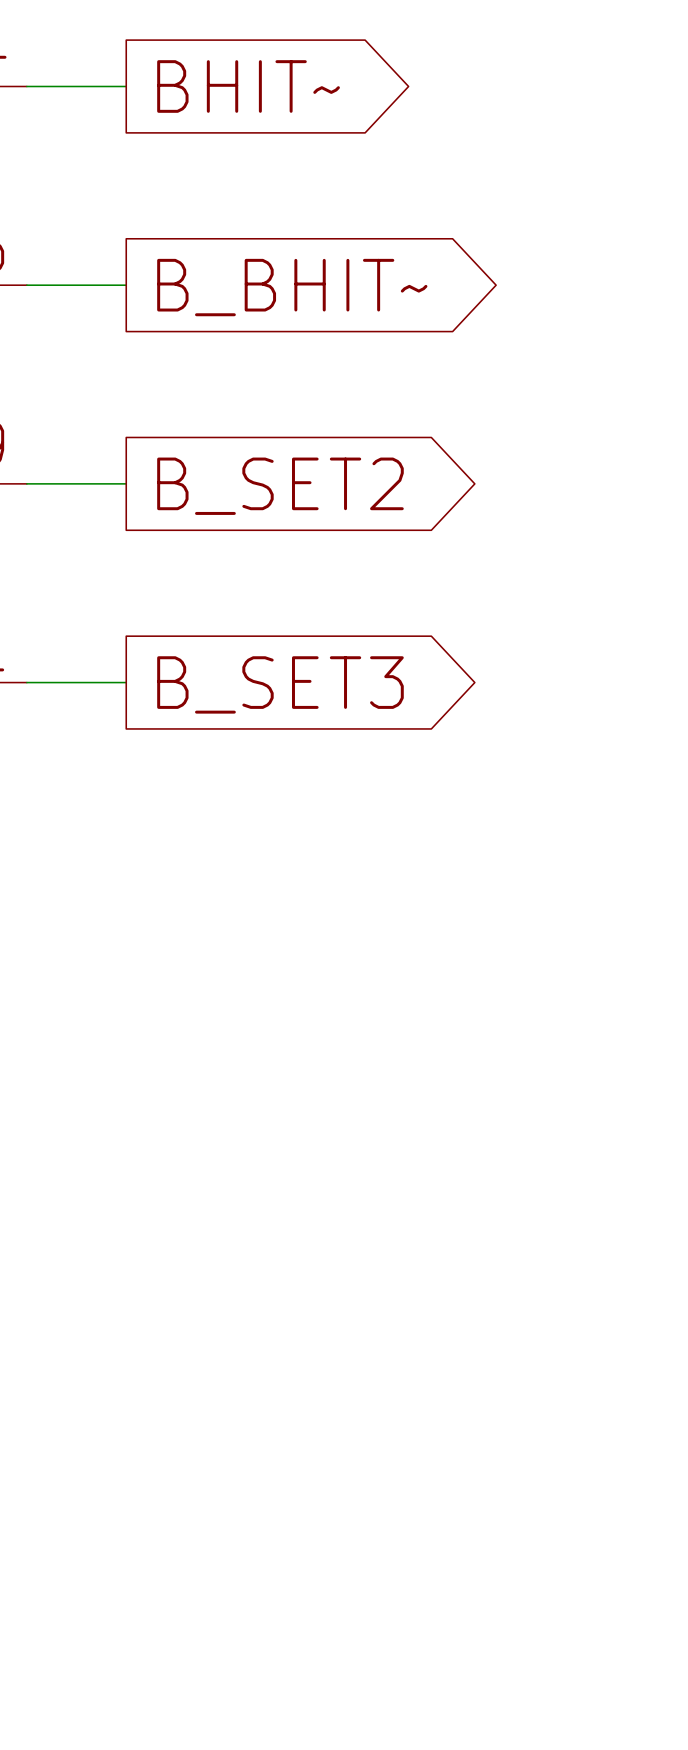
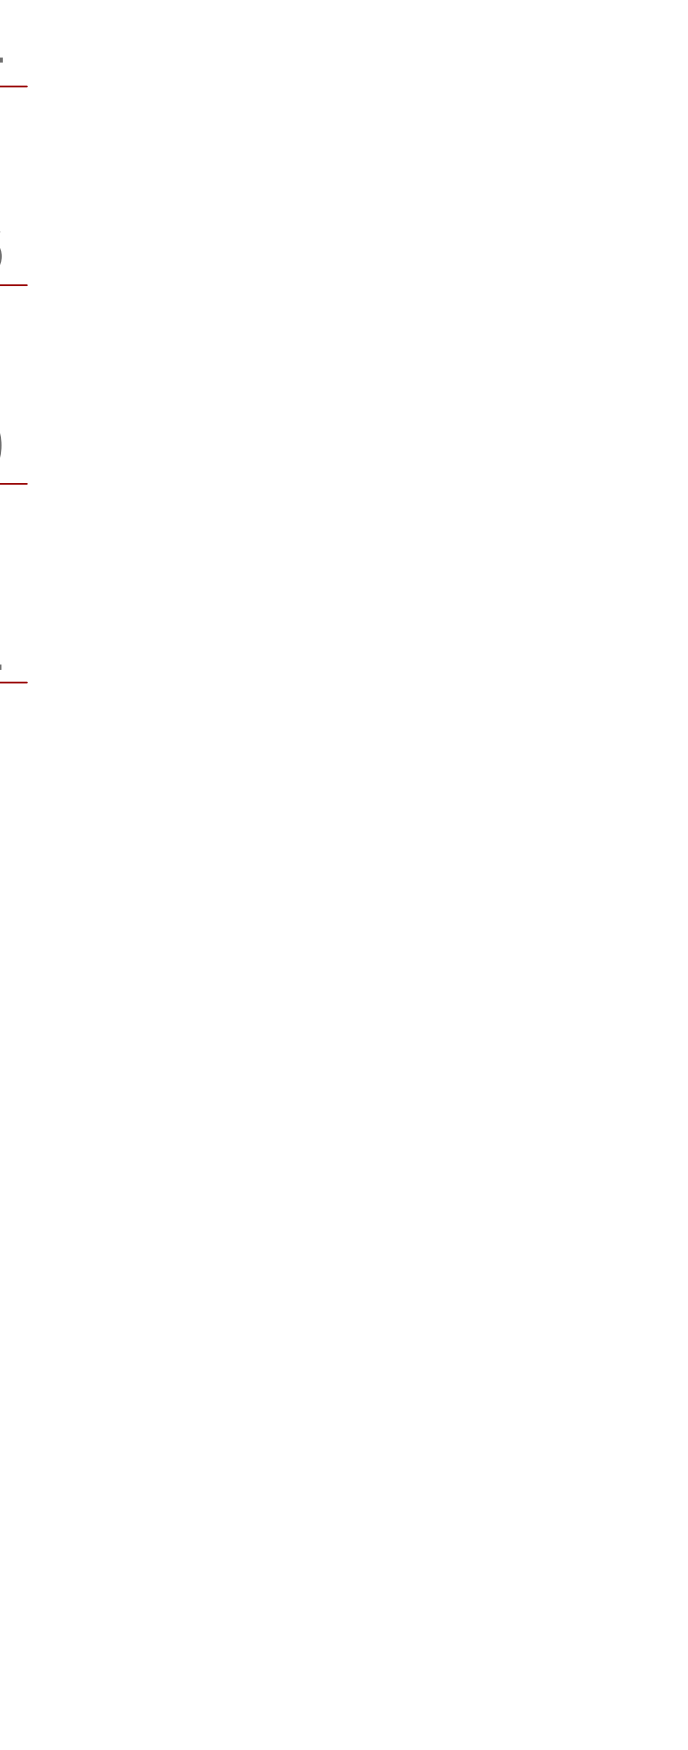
wire: (26, 86) (126, 86) -> none
global label: BHIT~ (248, 86) -> none
wire: (26, 285) (126, 285) -> none
global label: B_BHIT~ (292, 287) -> none
wire: (26, 483) (126, 483) -> none
global label: B_SET2 (280, 486) -> none
wire: (26, 682) (126, 682) -> none
global label: B_SET3 (280, 684) -> none

